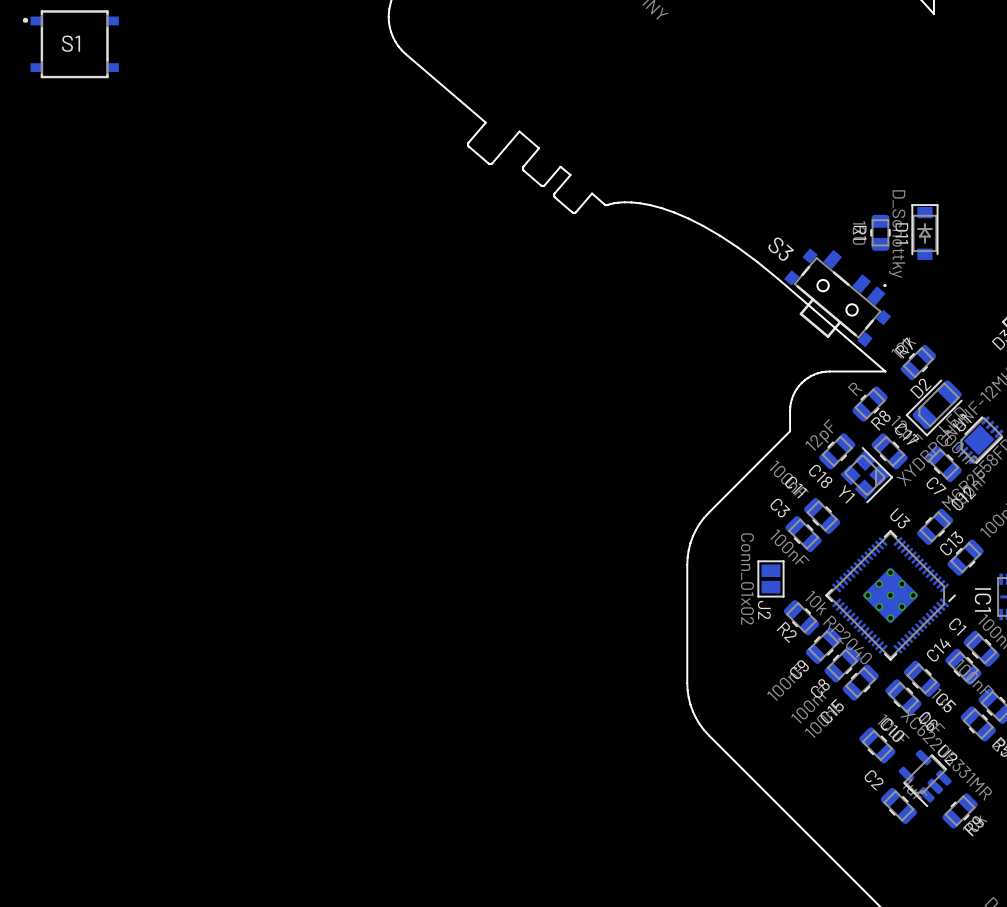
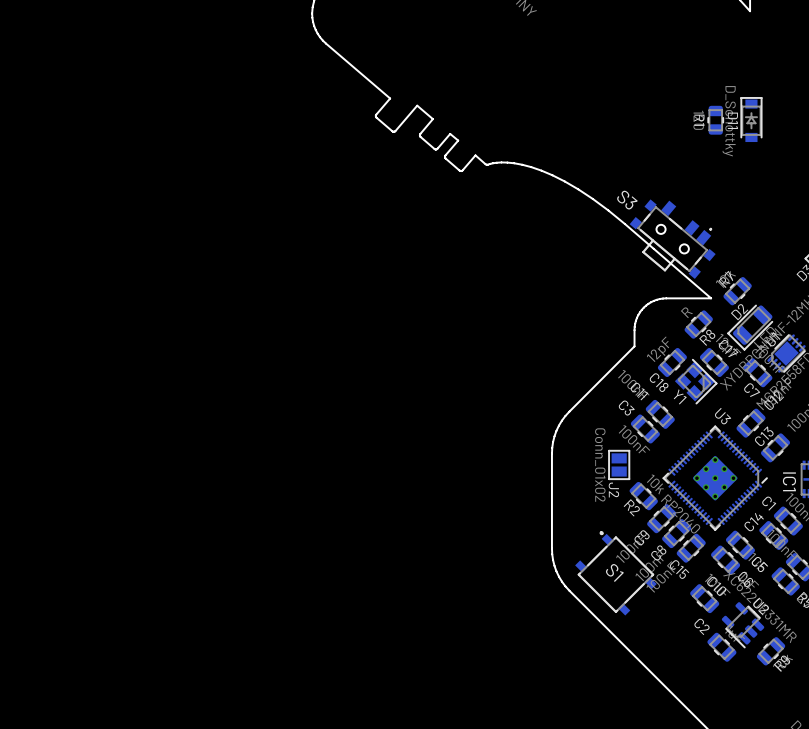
S1 footprint: [22, 10, 119, 79] -> [575, 531, 657, 616]
R1 position: (880, 232) -> (715, 120)
D11 position: (924, 232) -> (751, 119)
C15 name rotation: 0° (832, 711) -> 90° clockwise (679, 569)

